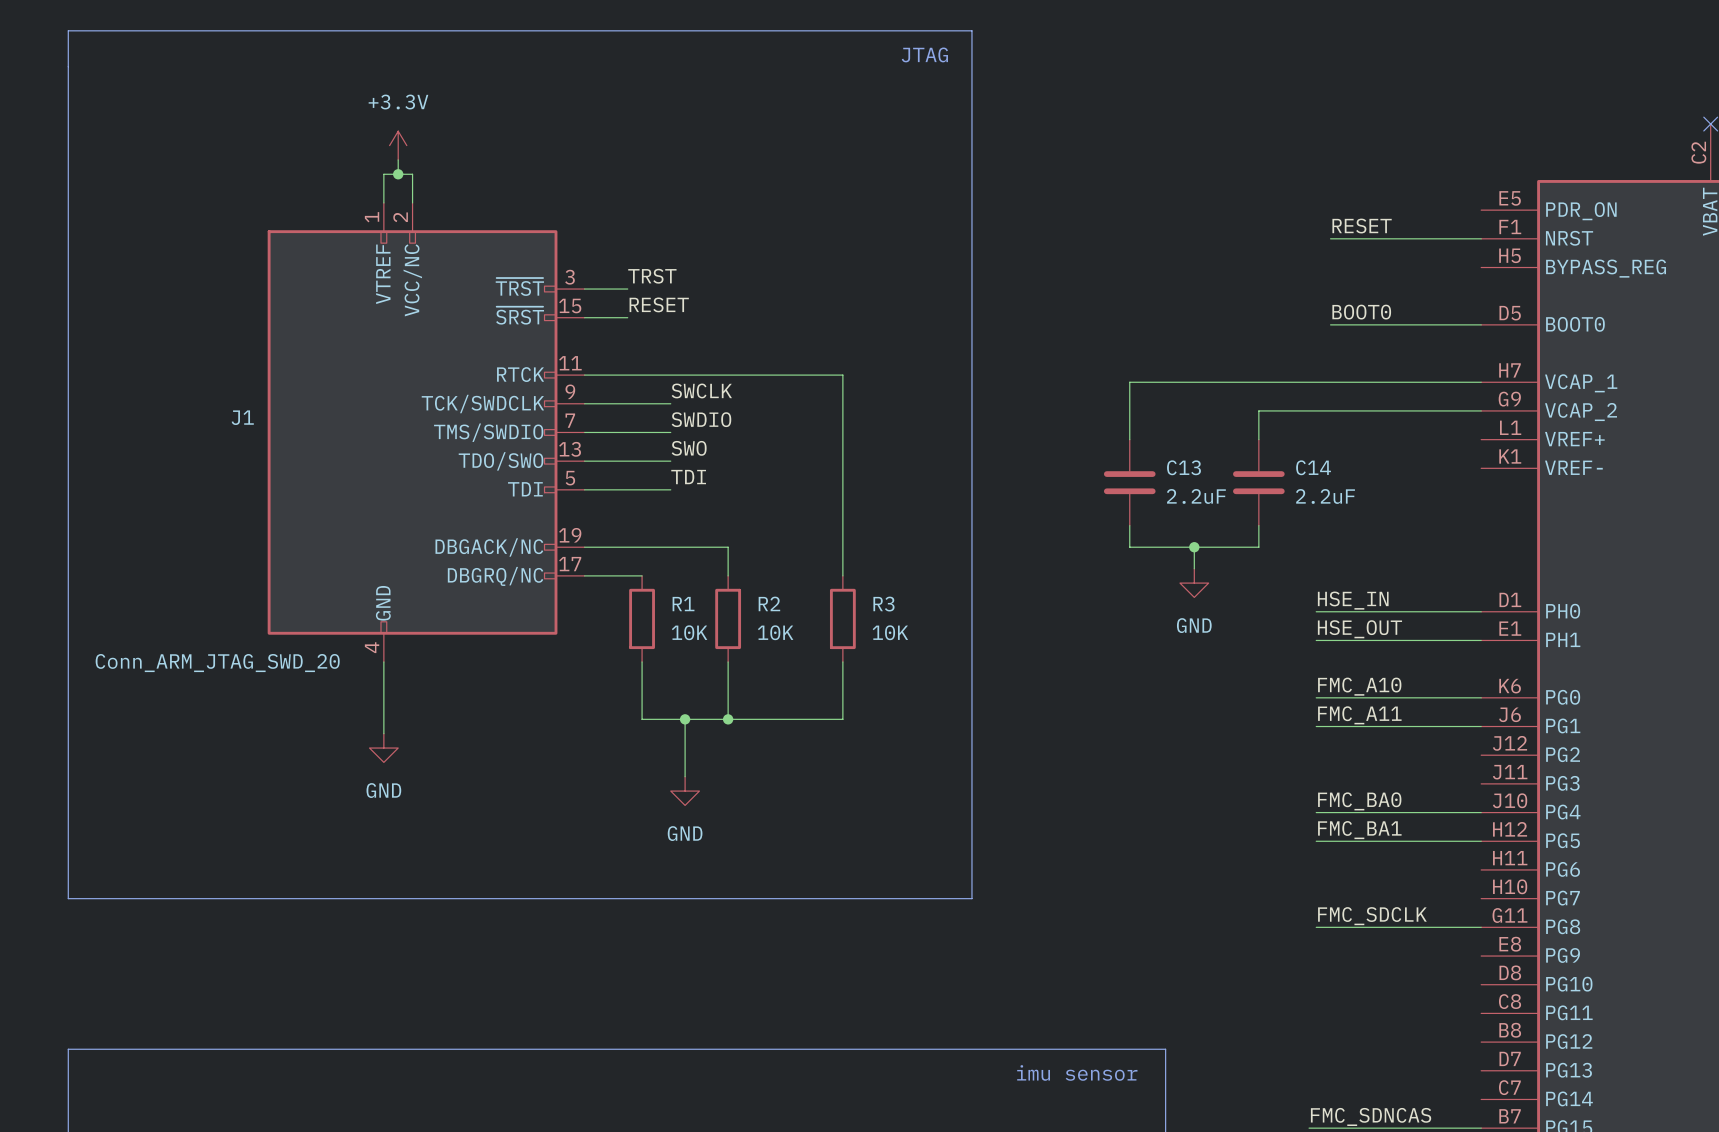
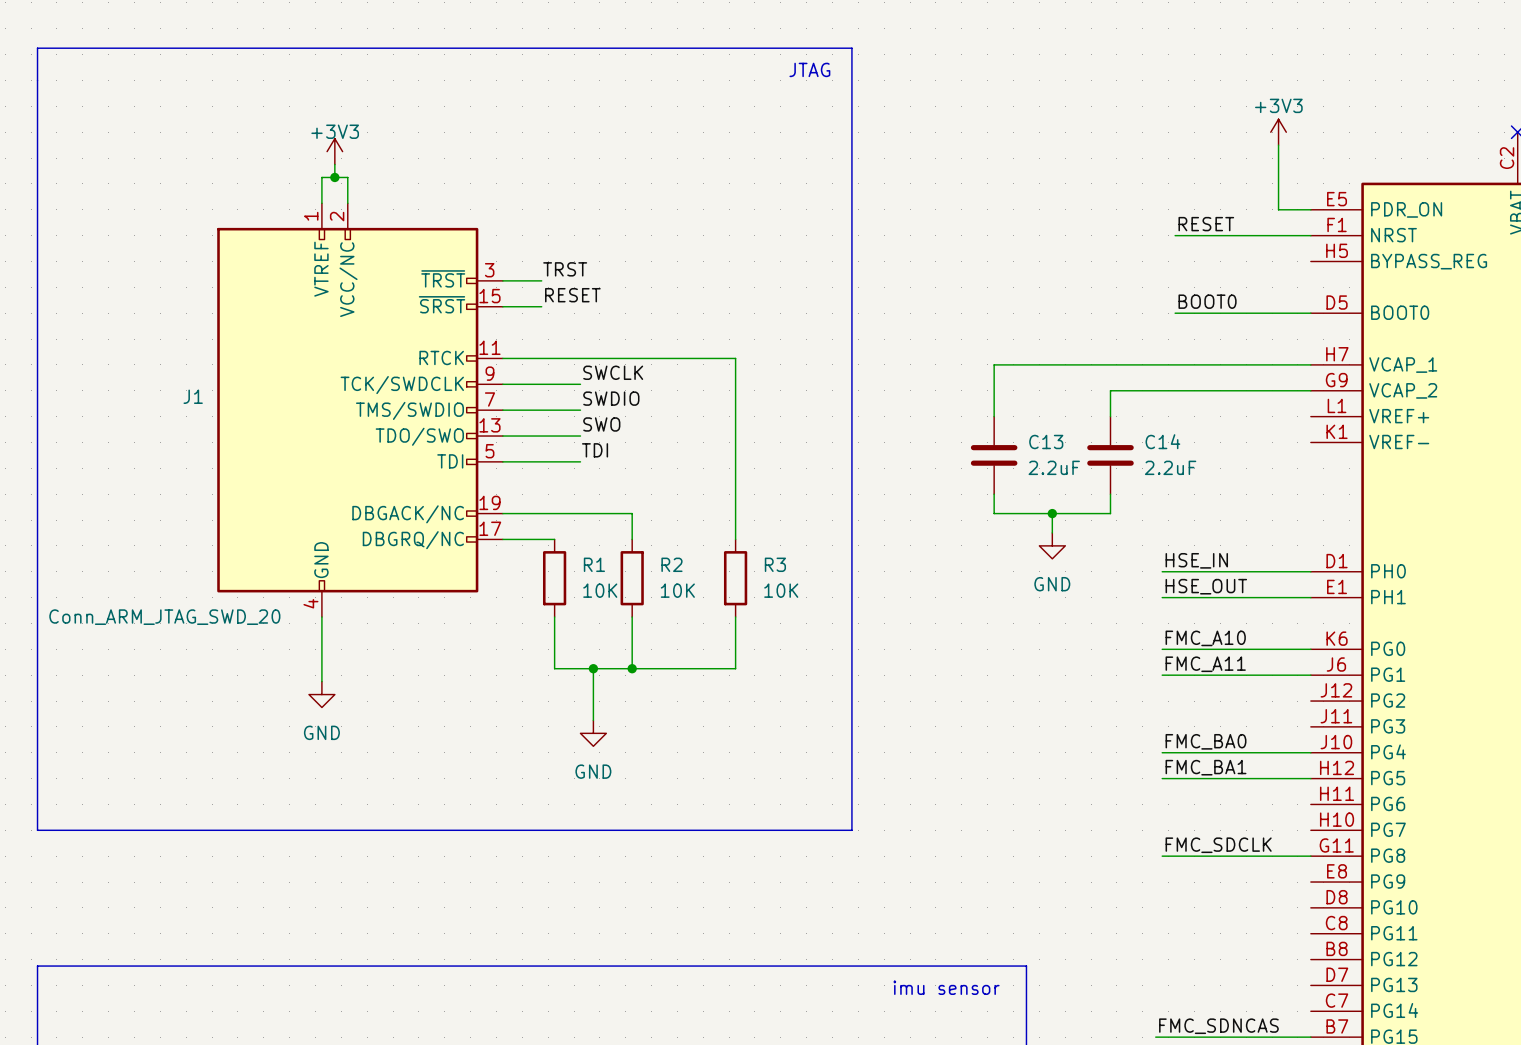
power symbol: none -> +3V3 (1278, 132)
wire: none -> (1278, 145) (1278, 209) (1310, 209)
power symbol: +3.3V (398, 145) -> +3V3 (334, 151)

